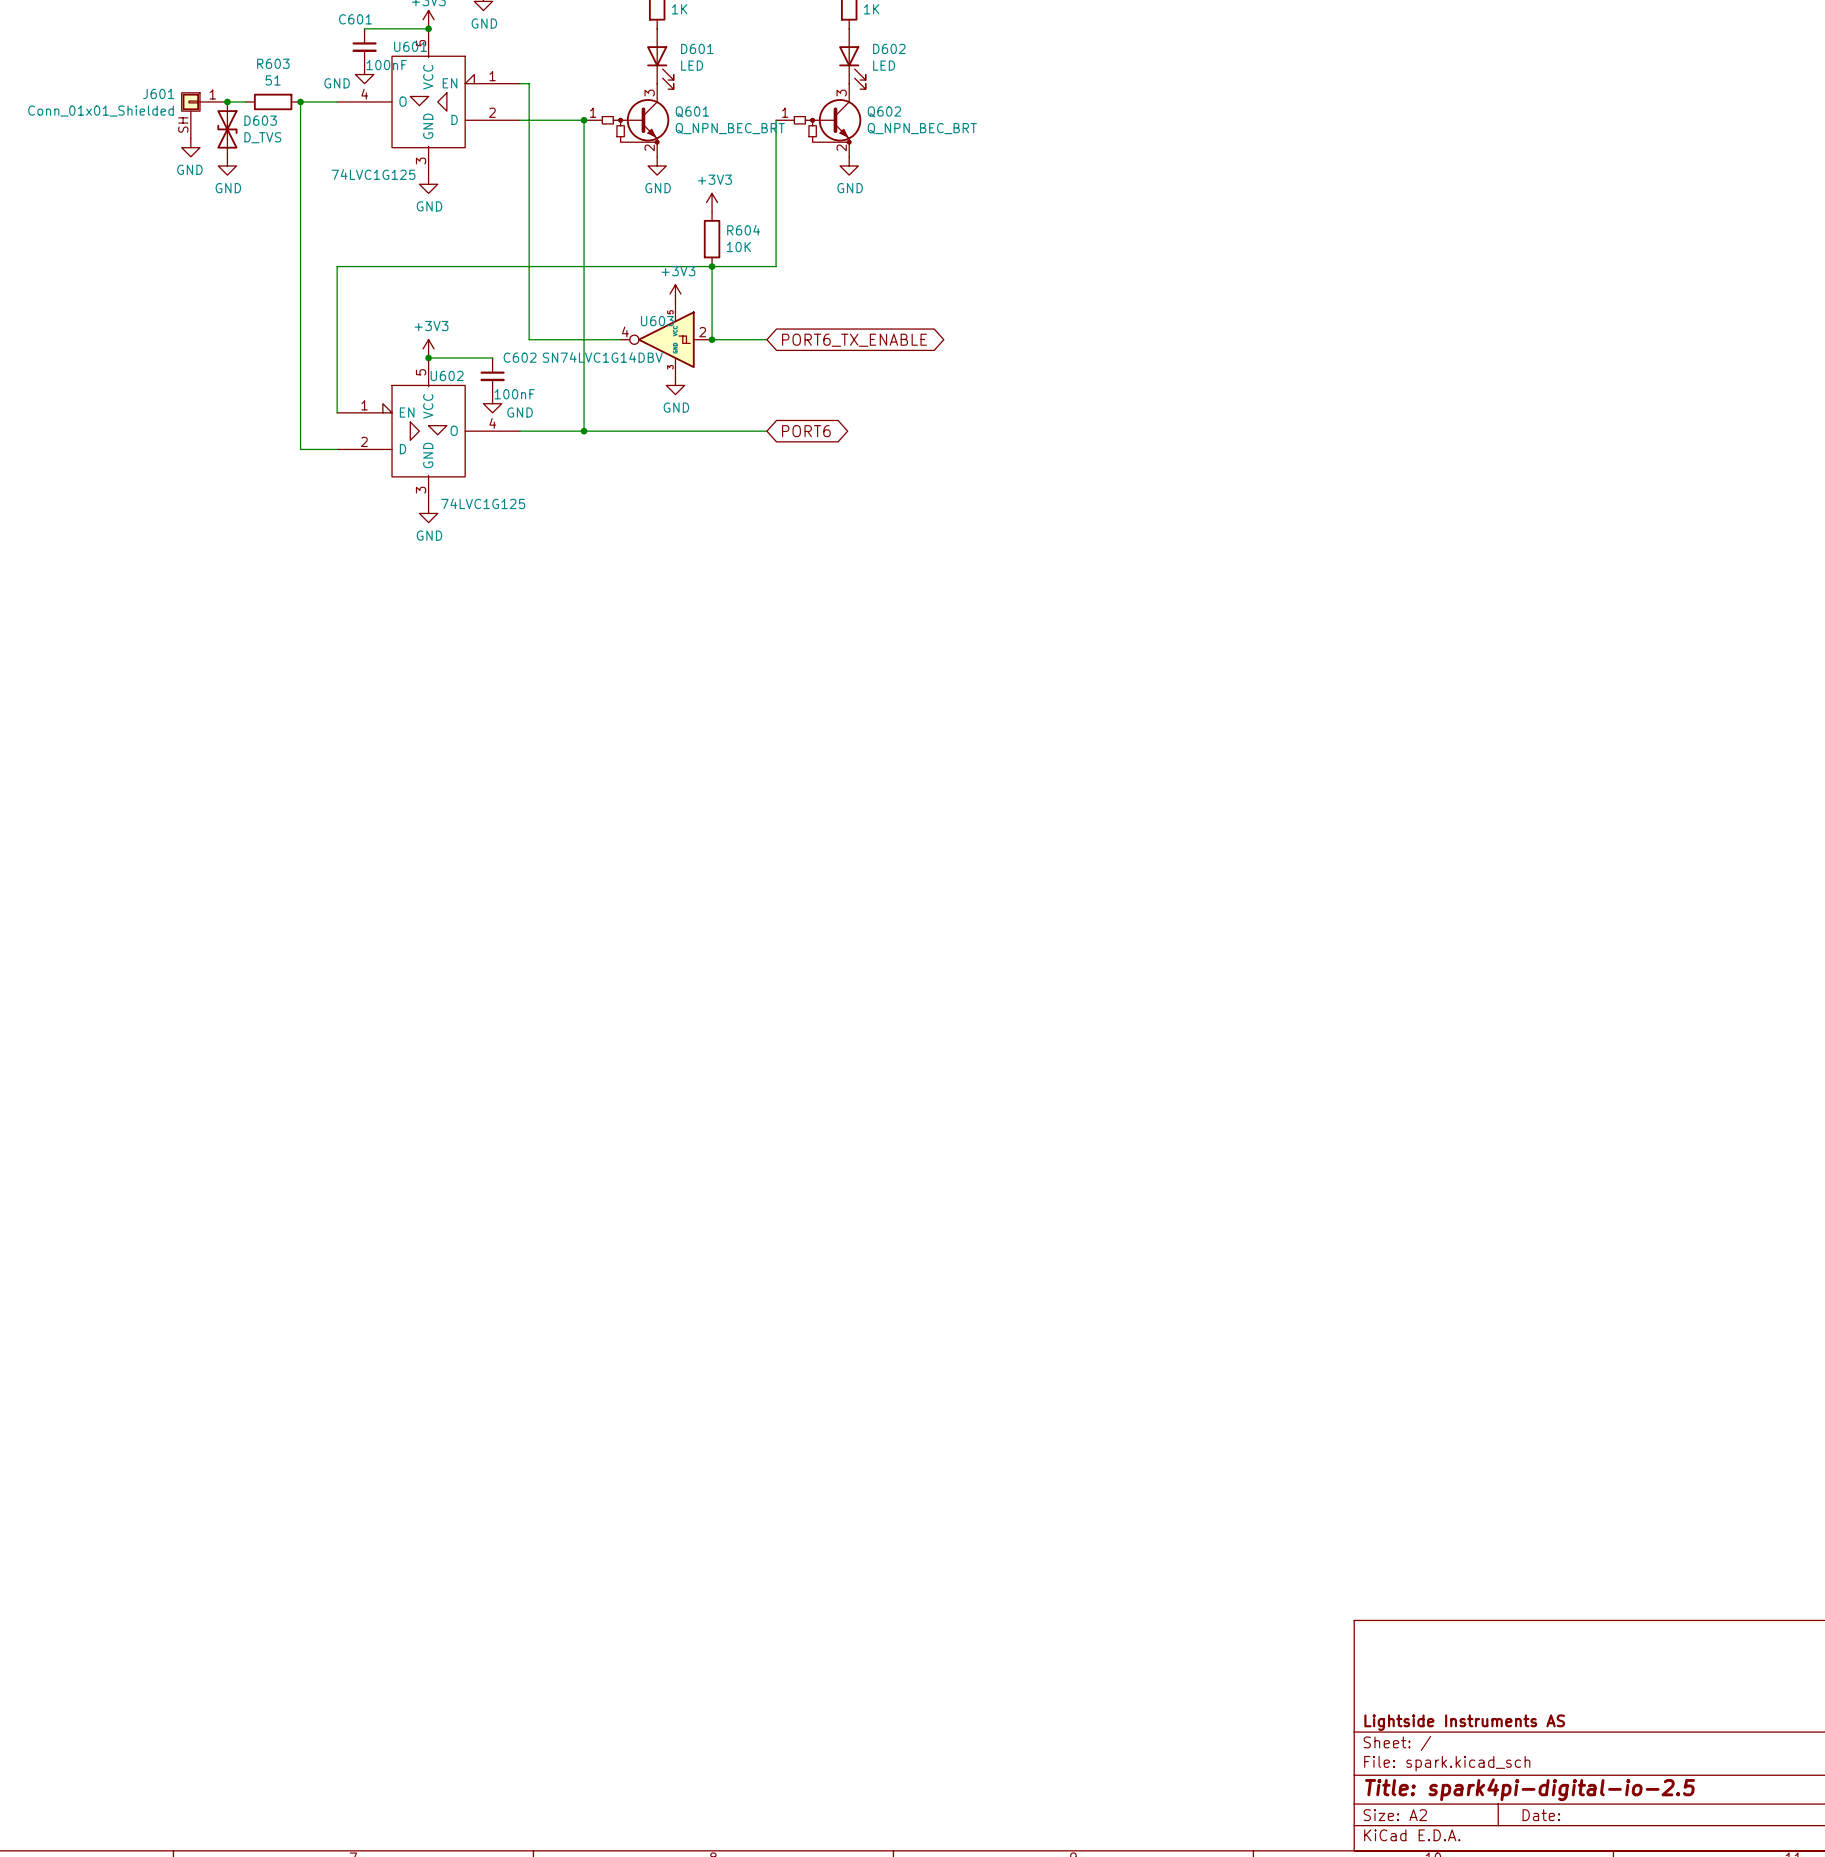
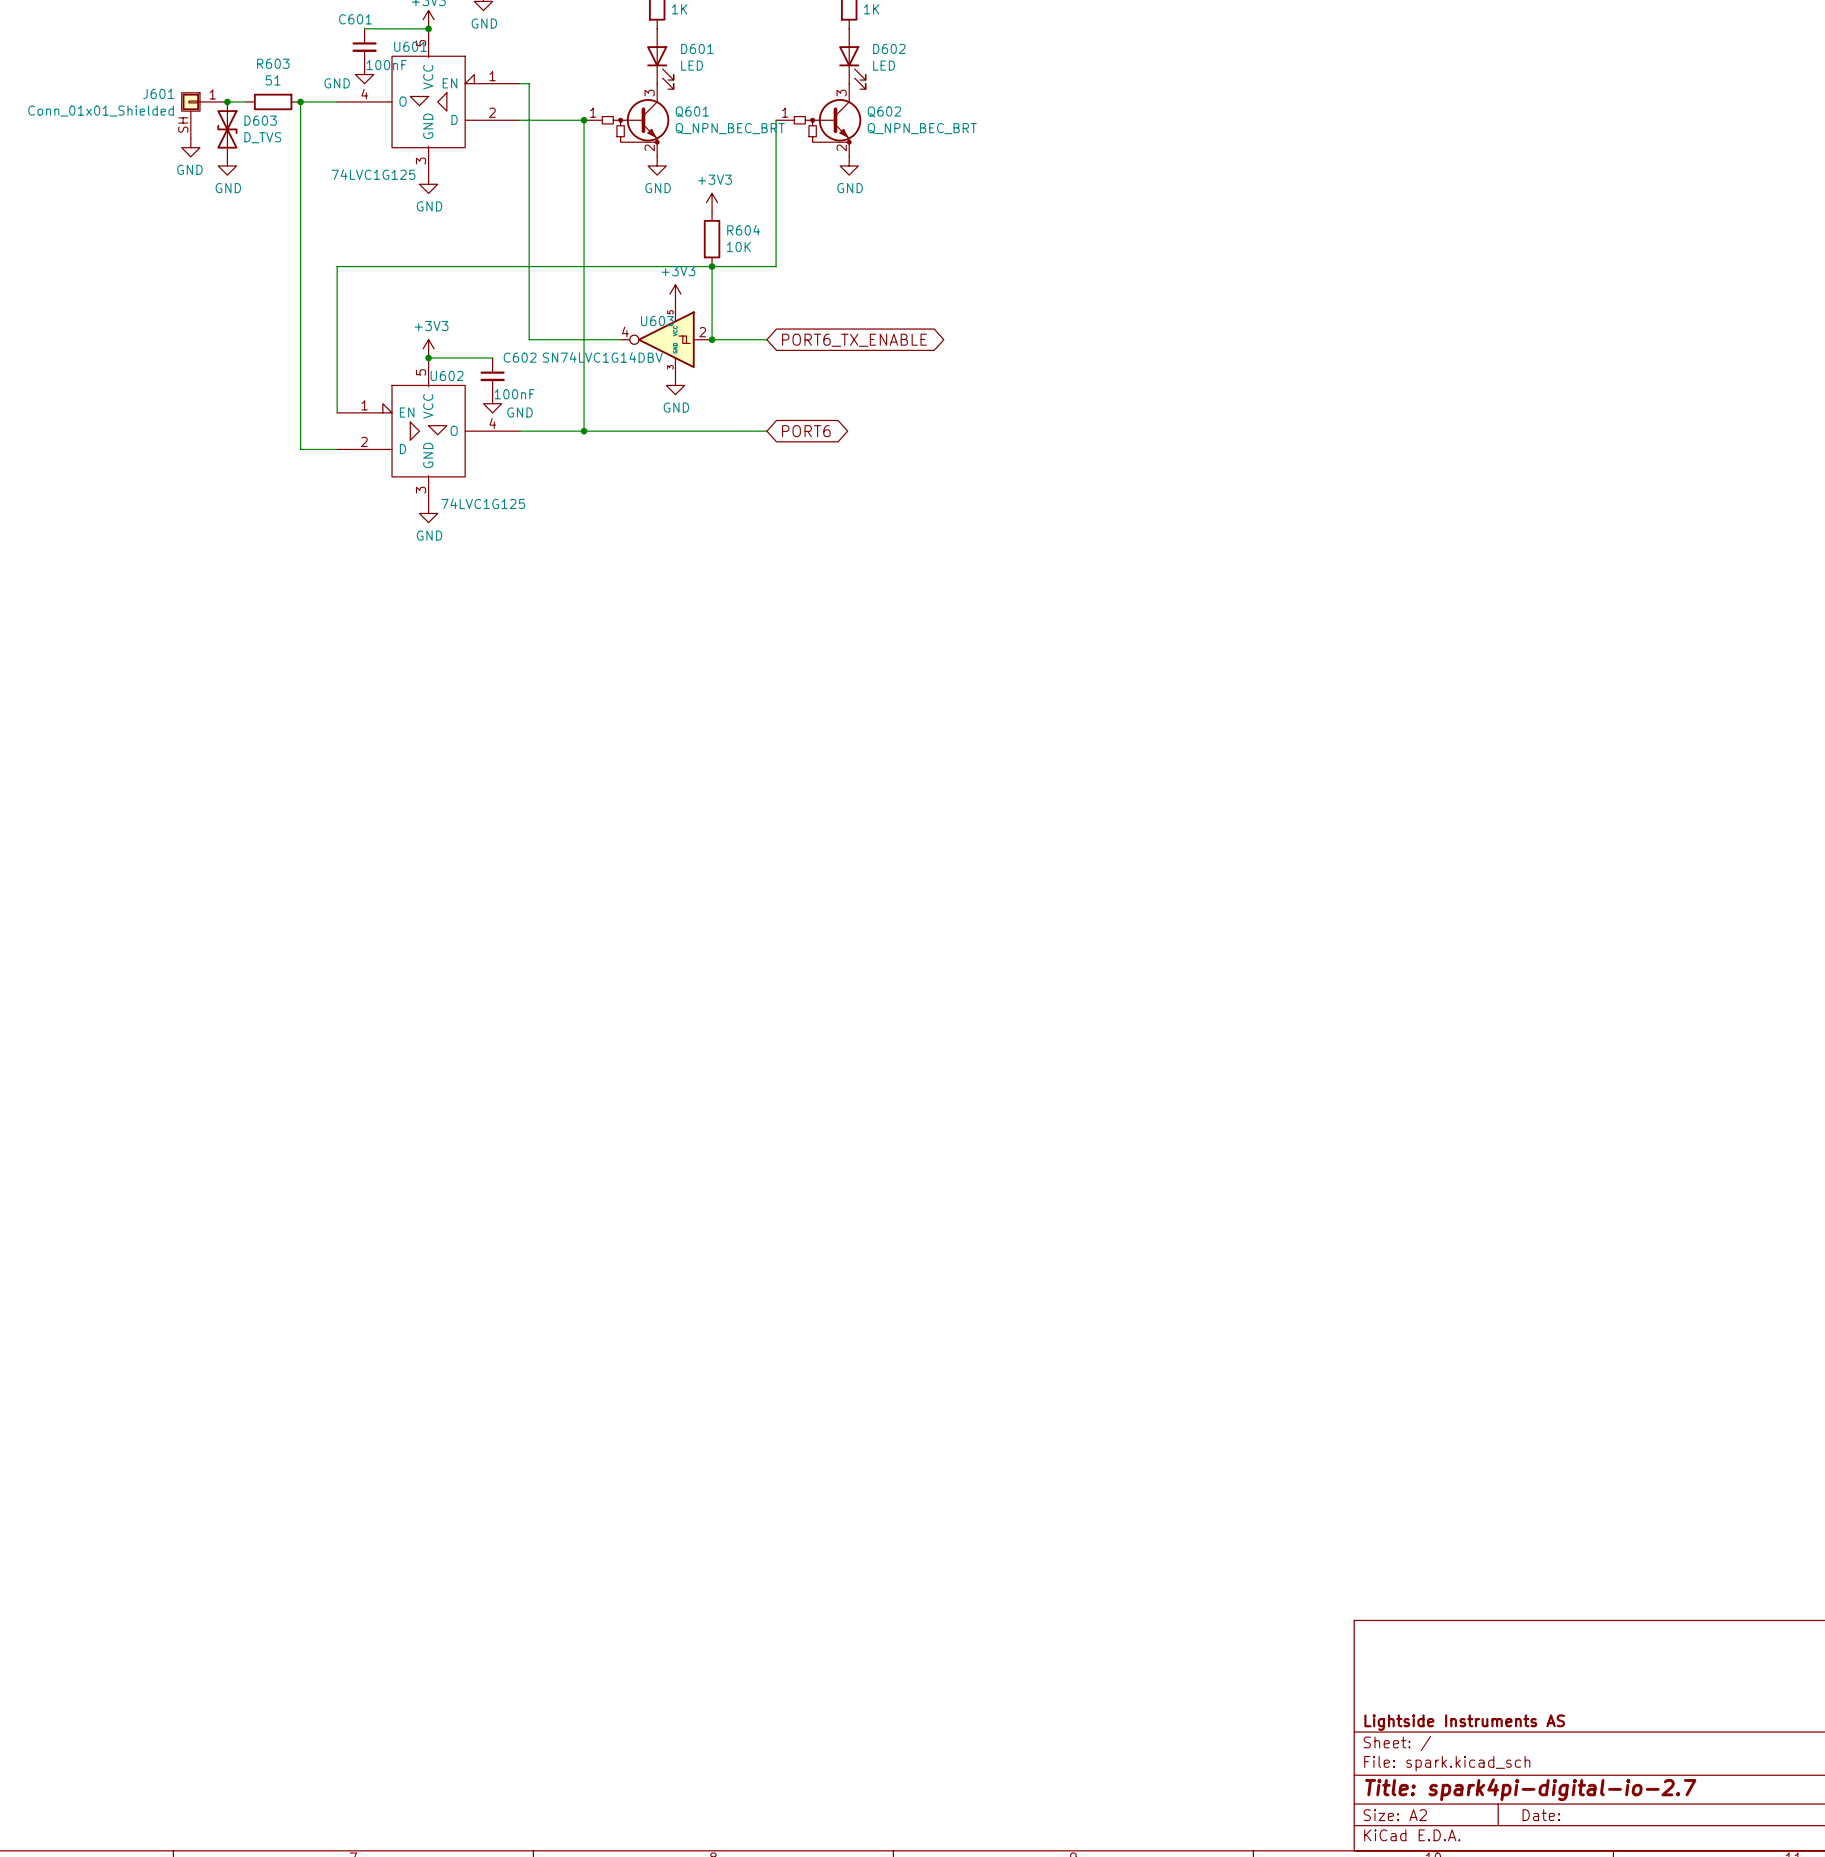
title block: Title: spark4pi-digital-io-2.5 (1530, 1789) -> Title: spark4pi-digital-io-2.7 (1530, 1789)

